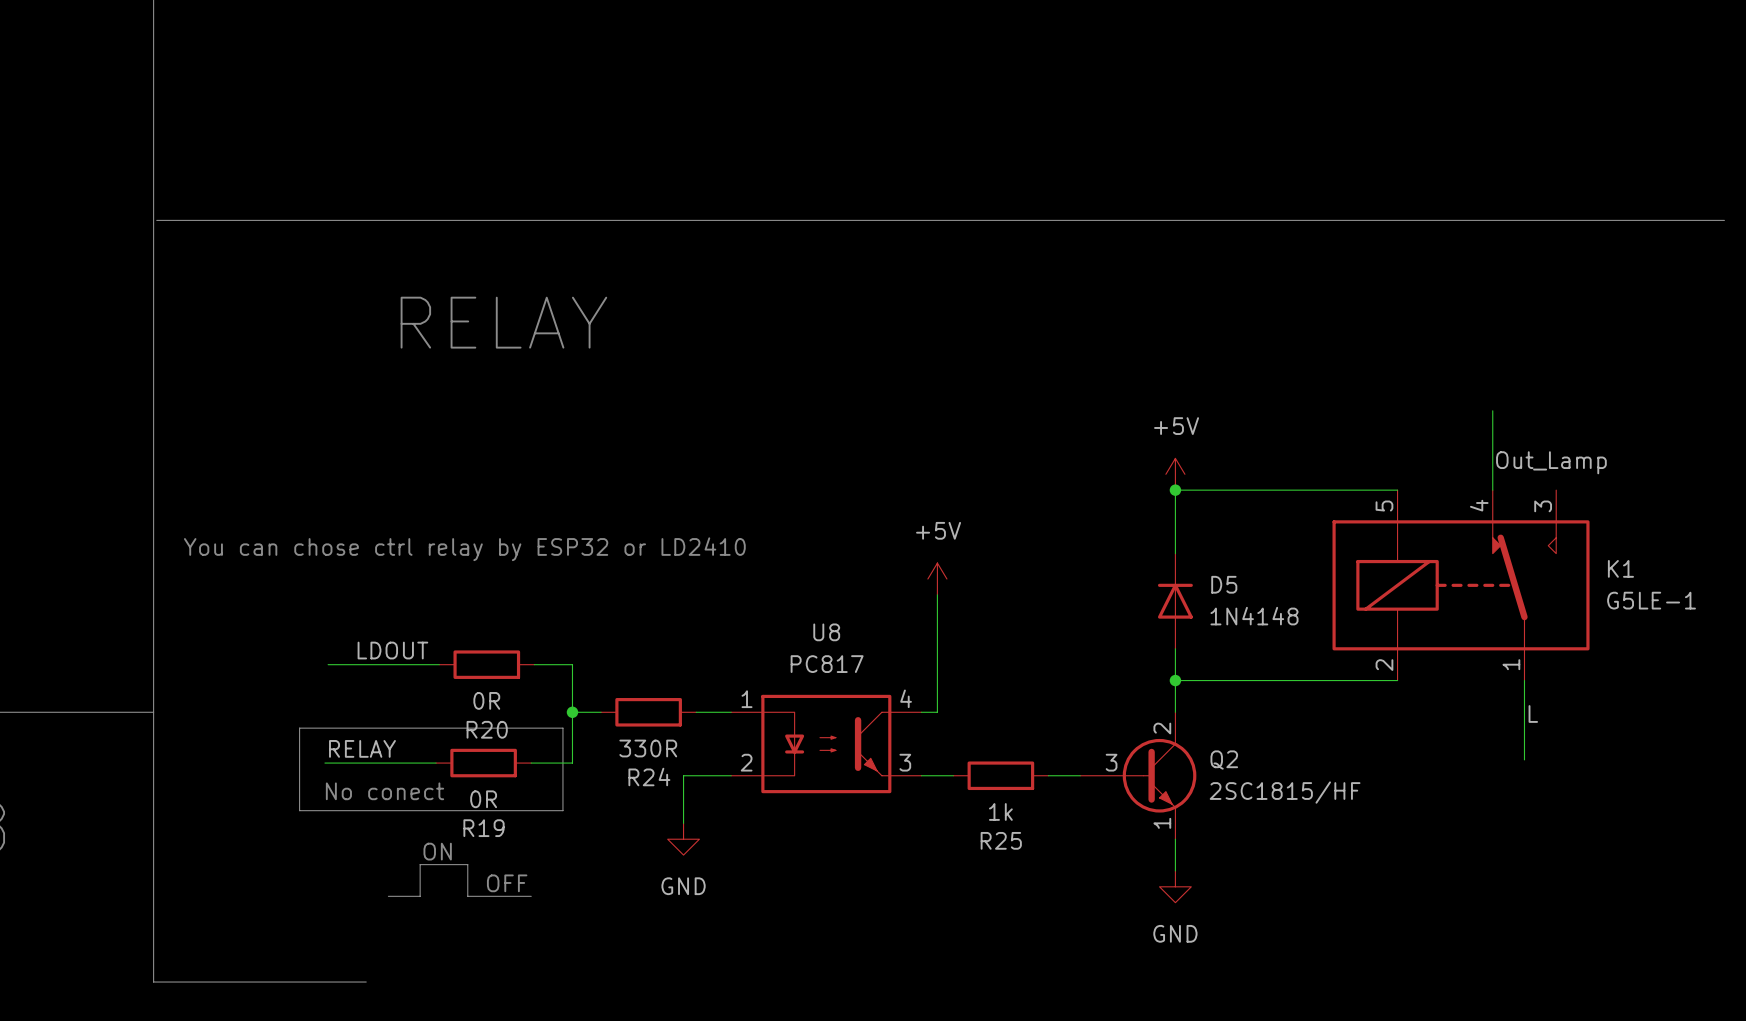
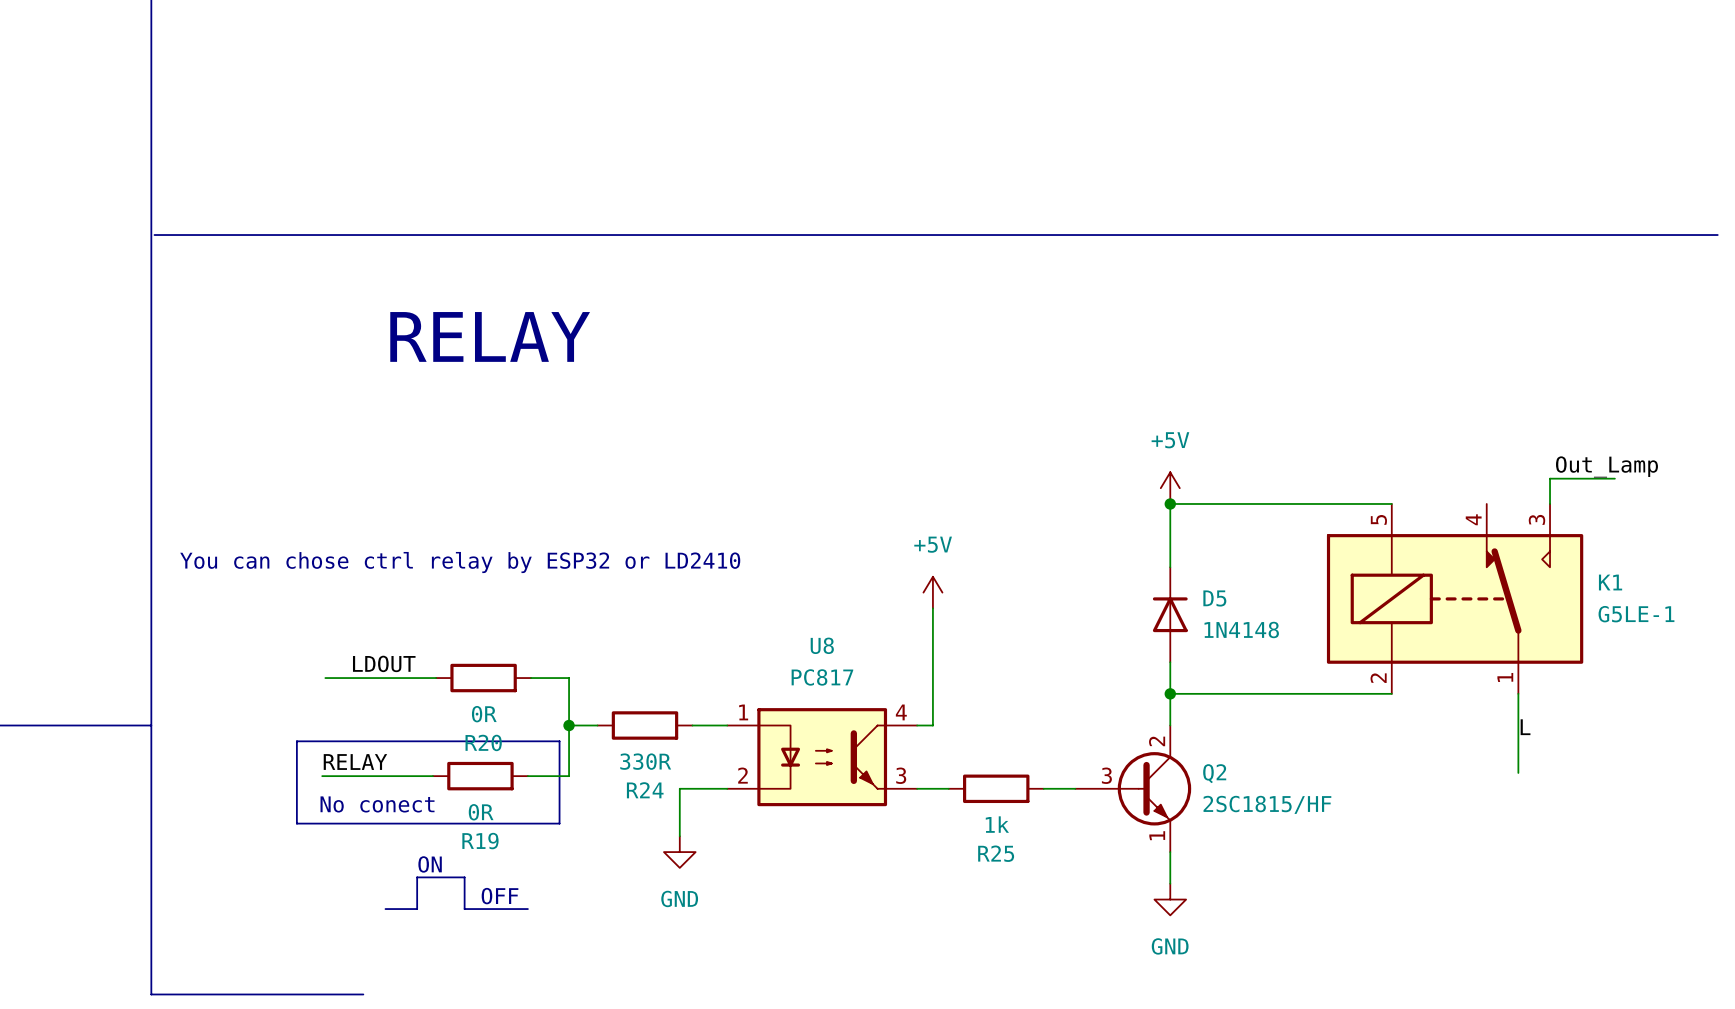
wire: (1492, 410) (1492, 490) -> none
label position: Out_Lamp (1551, 462) -> Out_Lamp (1606, 466)
wire: none -> (1614, 478) (1550, 478) (1550, 503)

